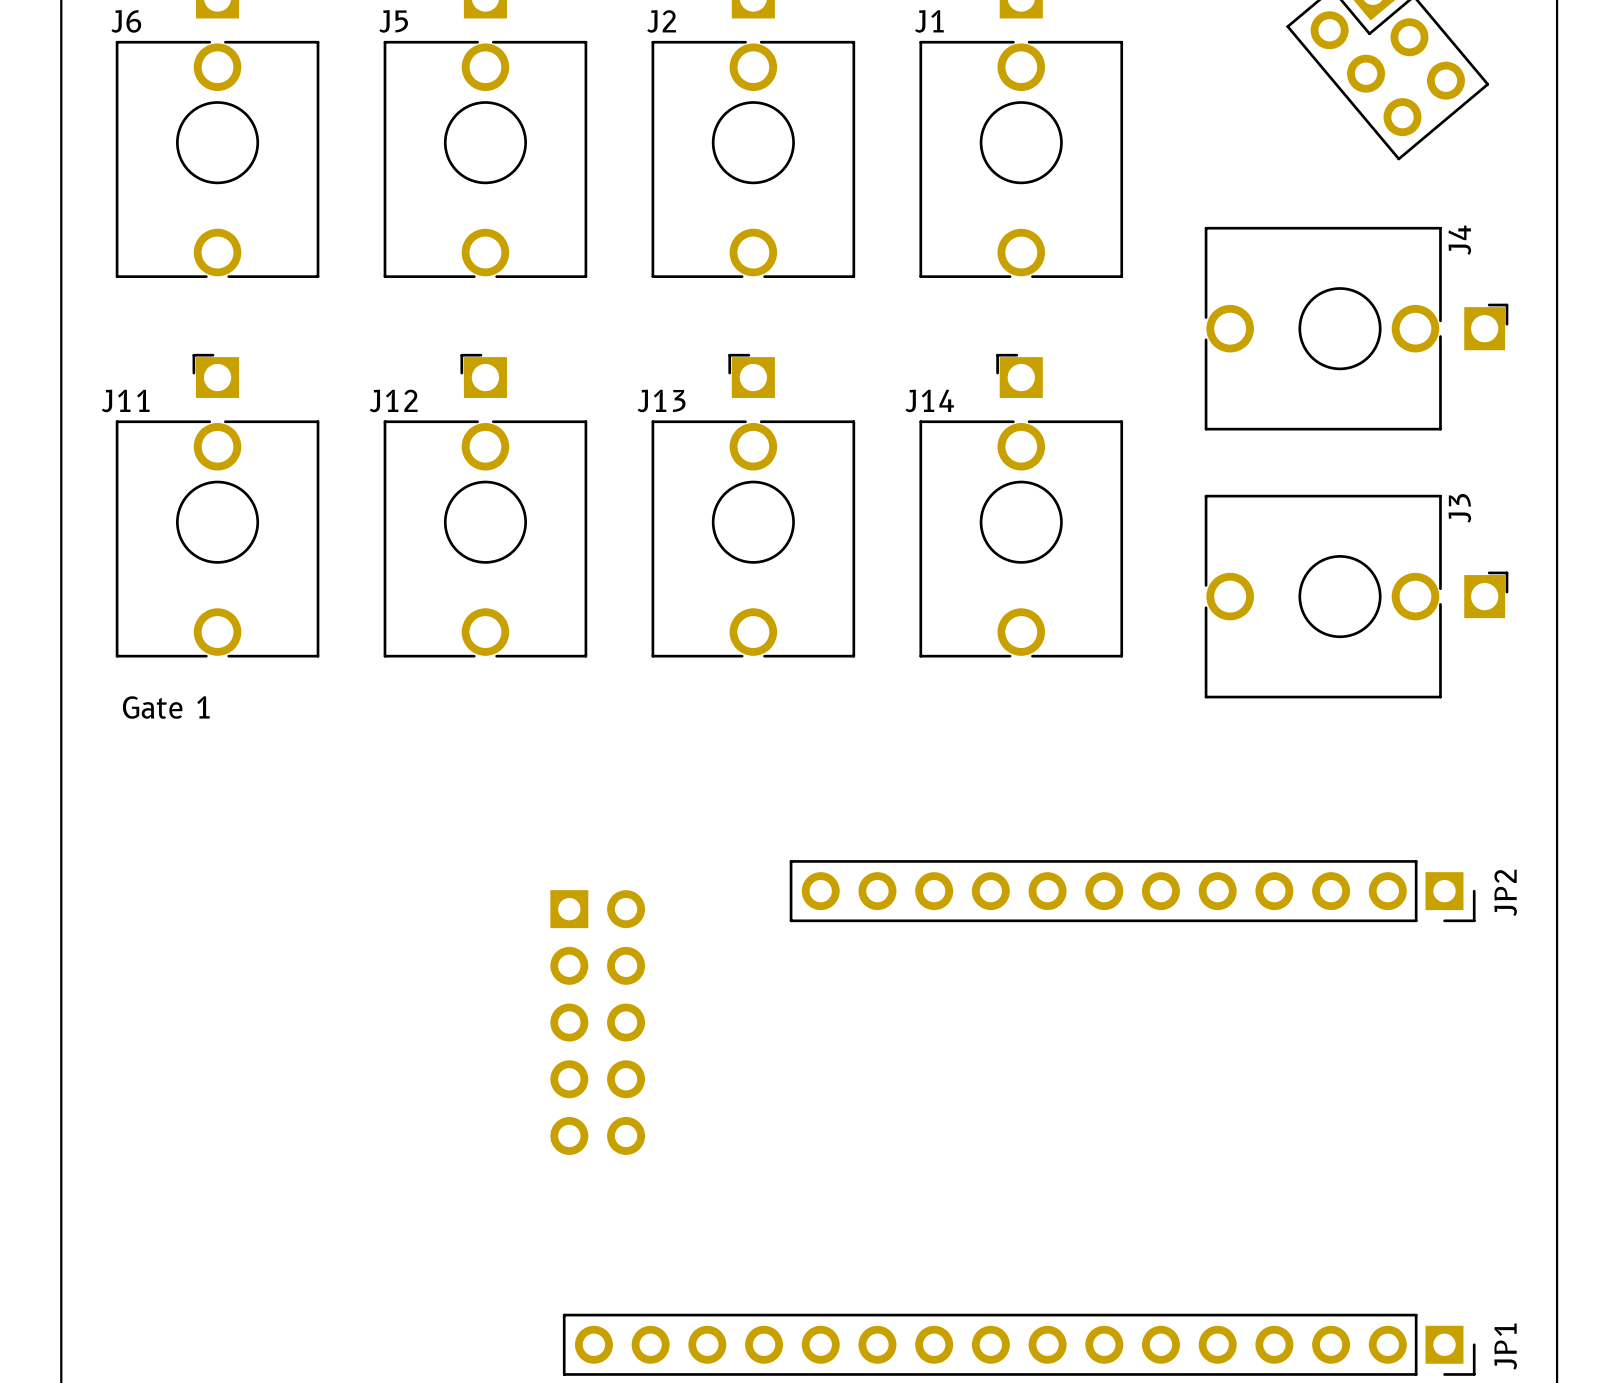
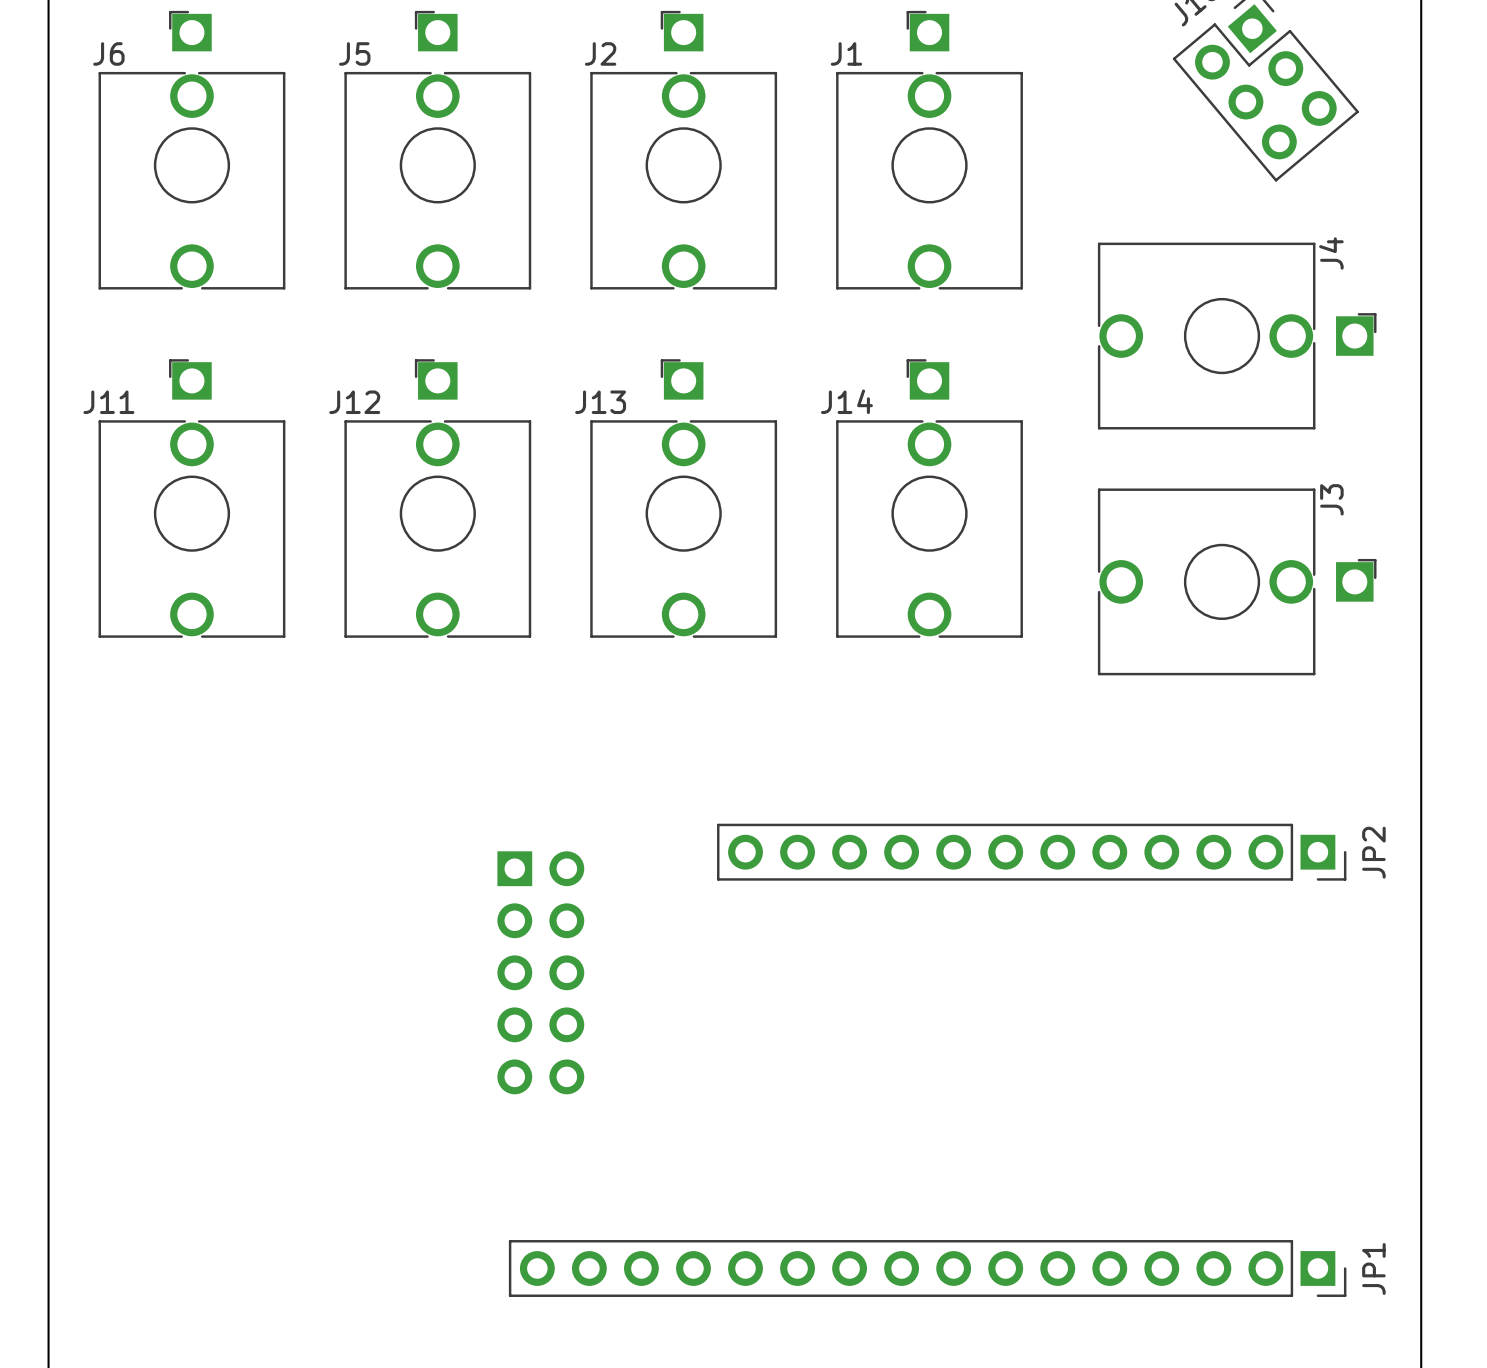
text: Gate 1 (166, 707) -> none

